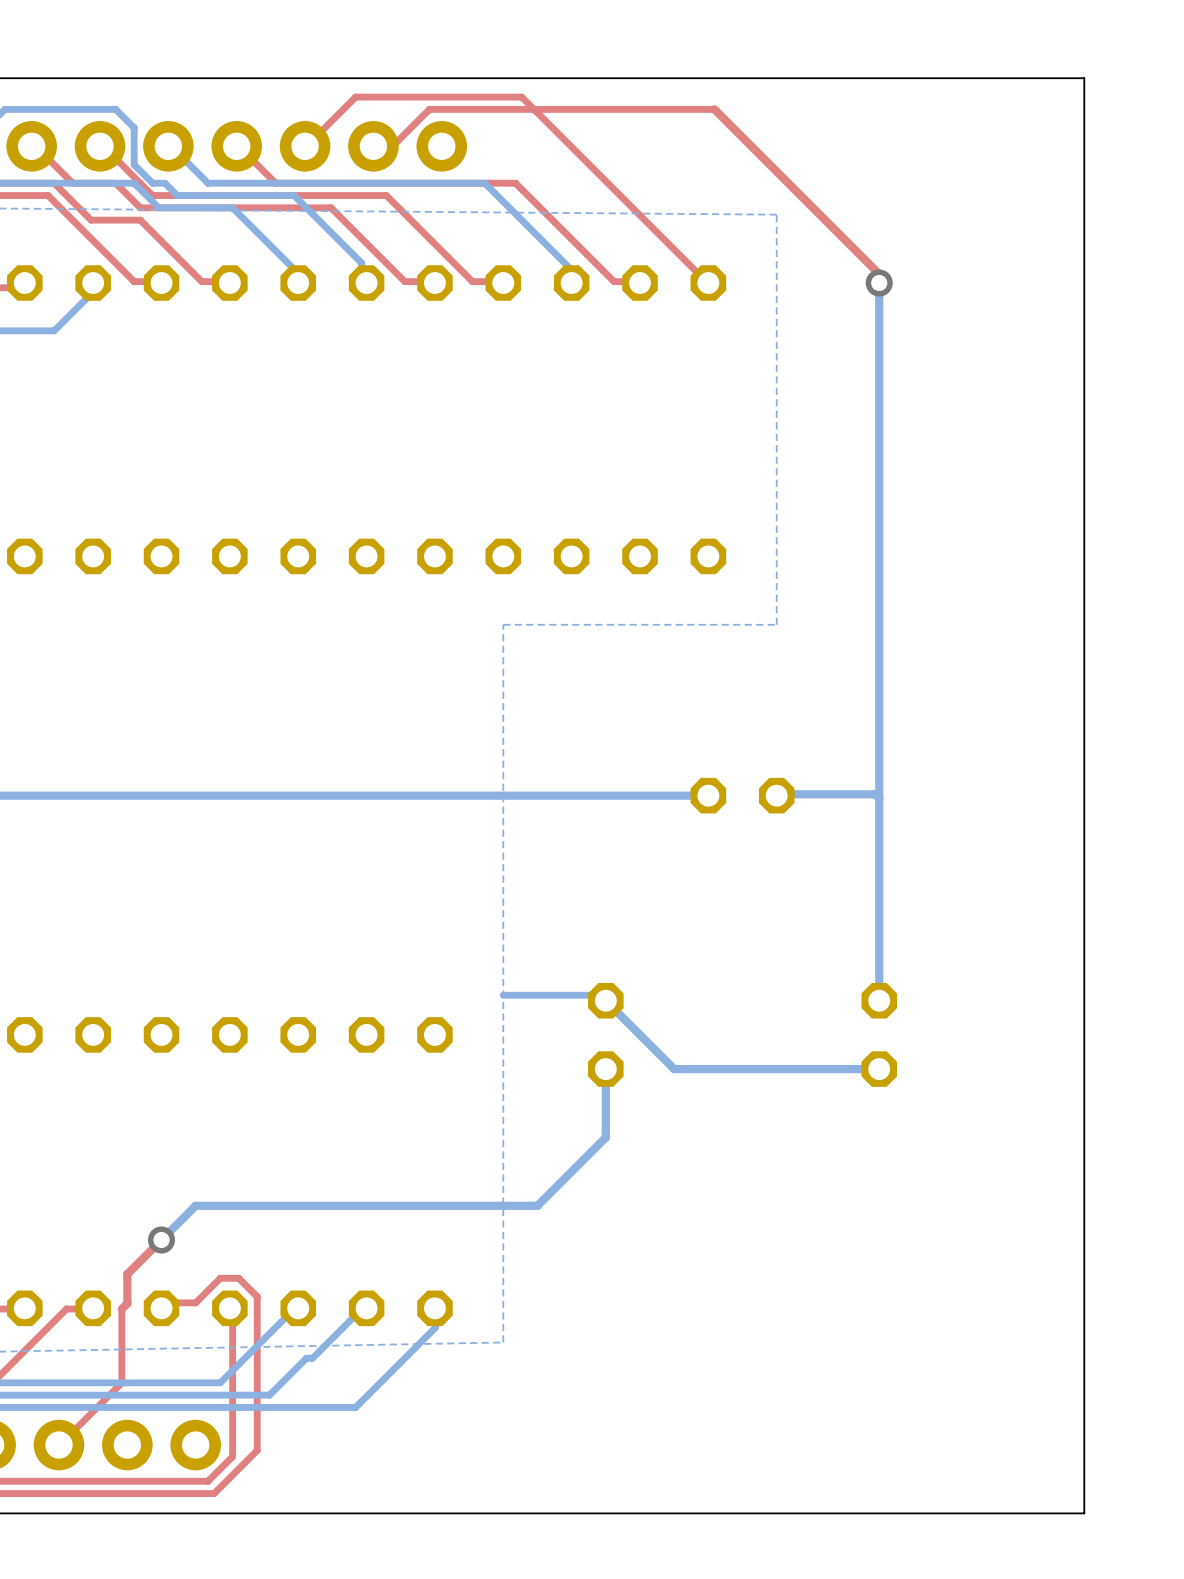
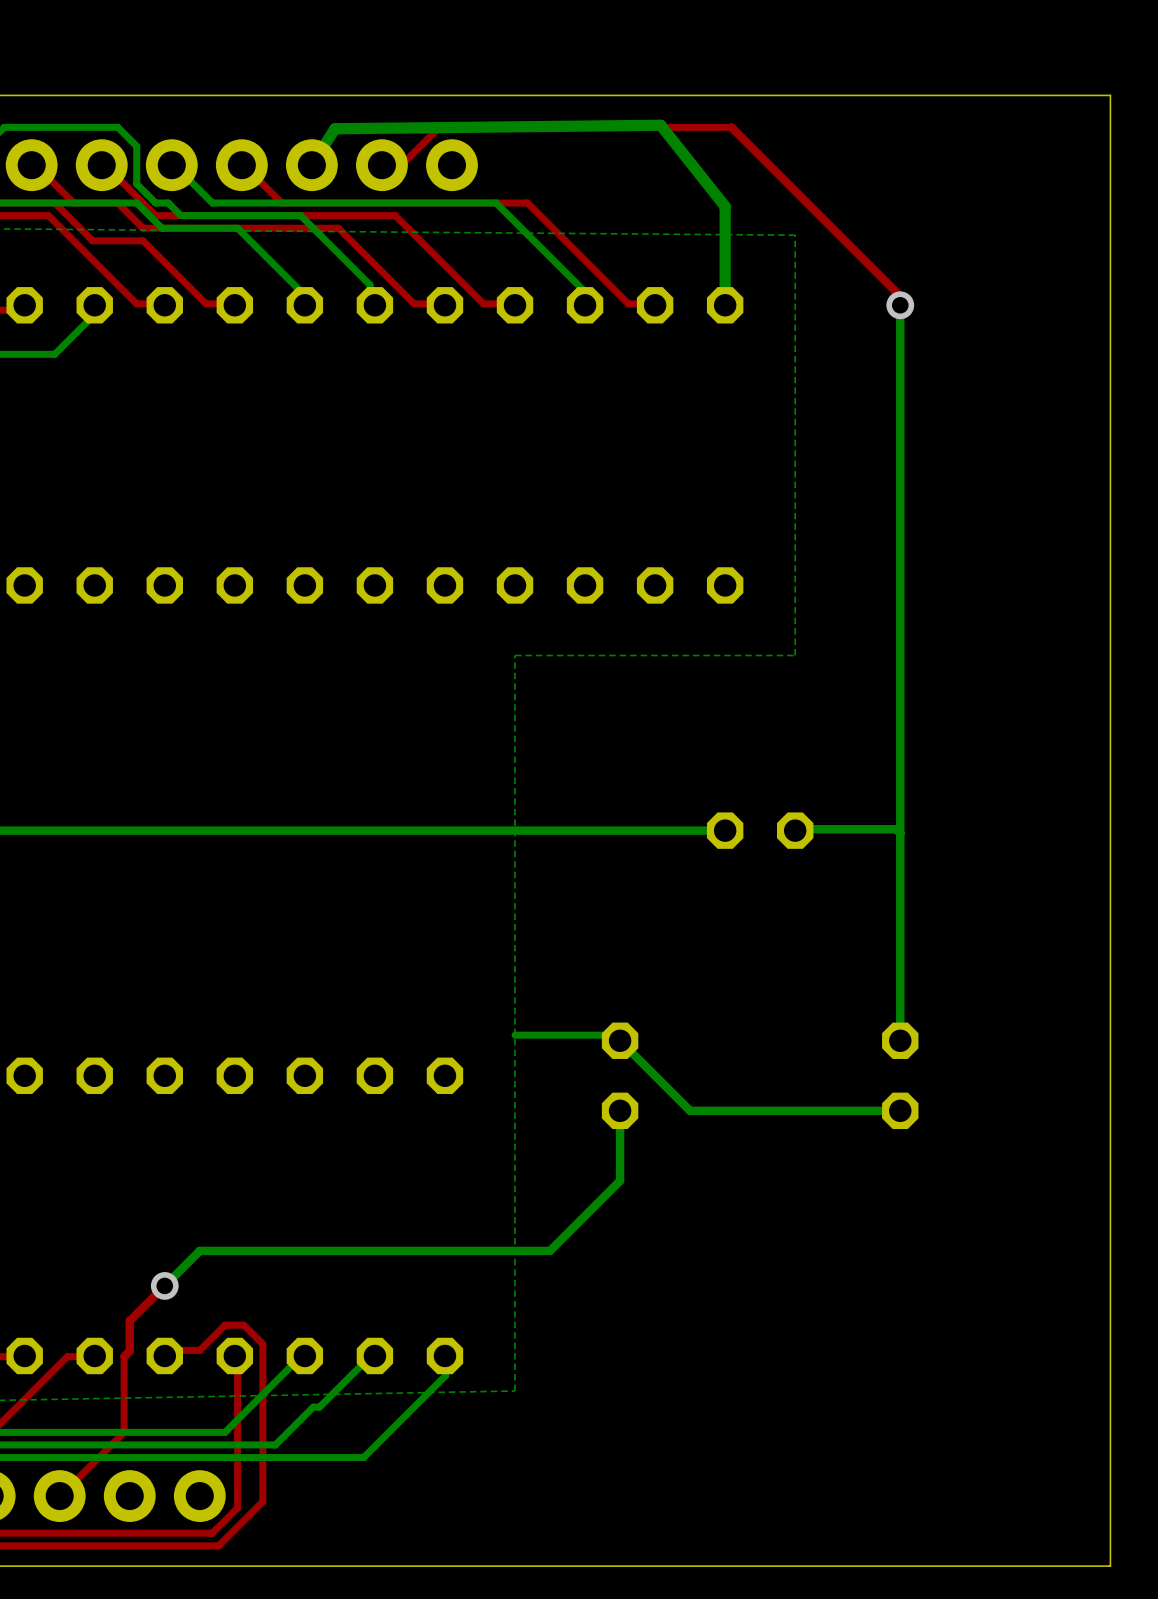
top track: (305, 146) (355, 97) (521, 97) (708, 283) -> none
bottom track: none -> (311, 165) (334, 128) (660, 125) (725, 206) (725, 305)

